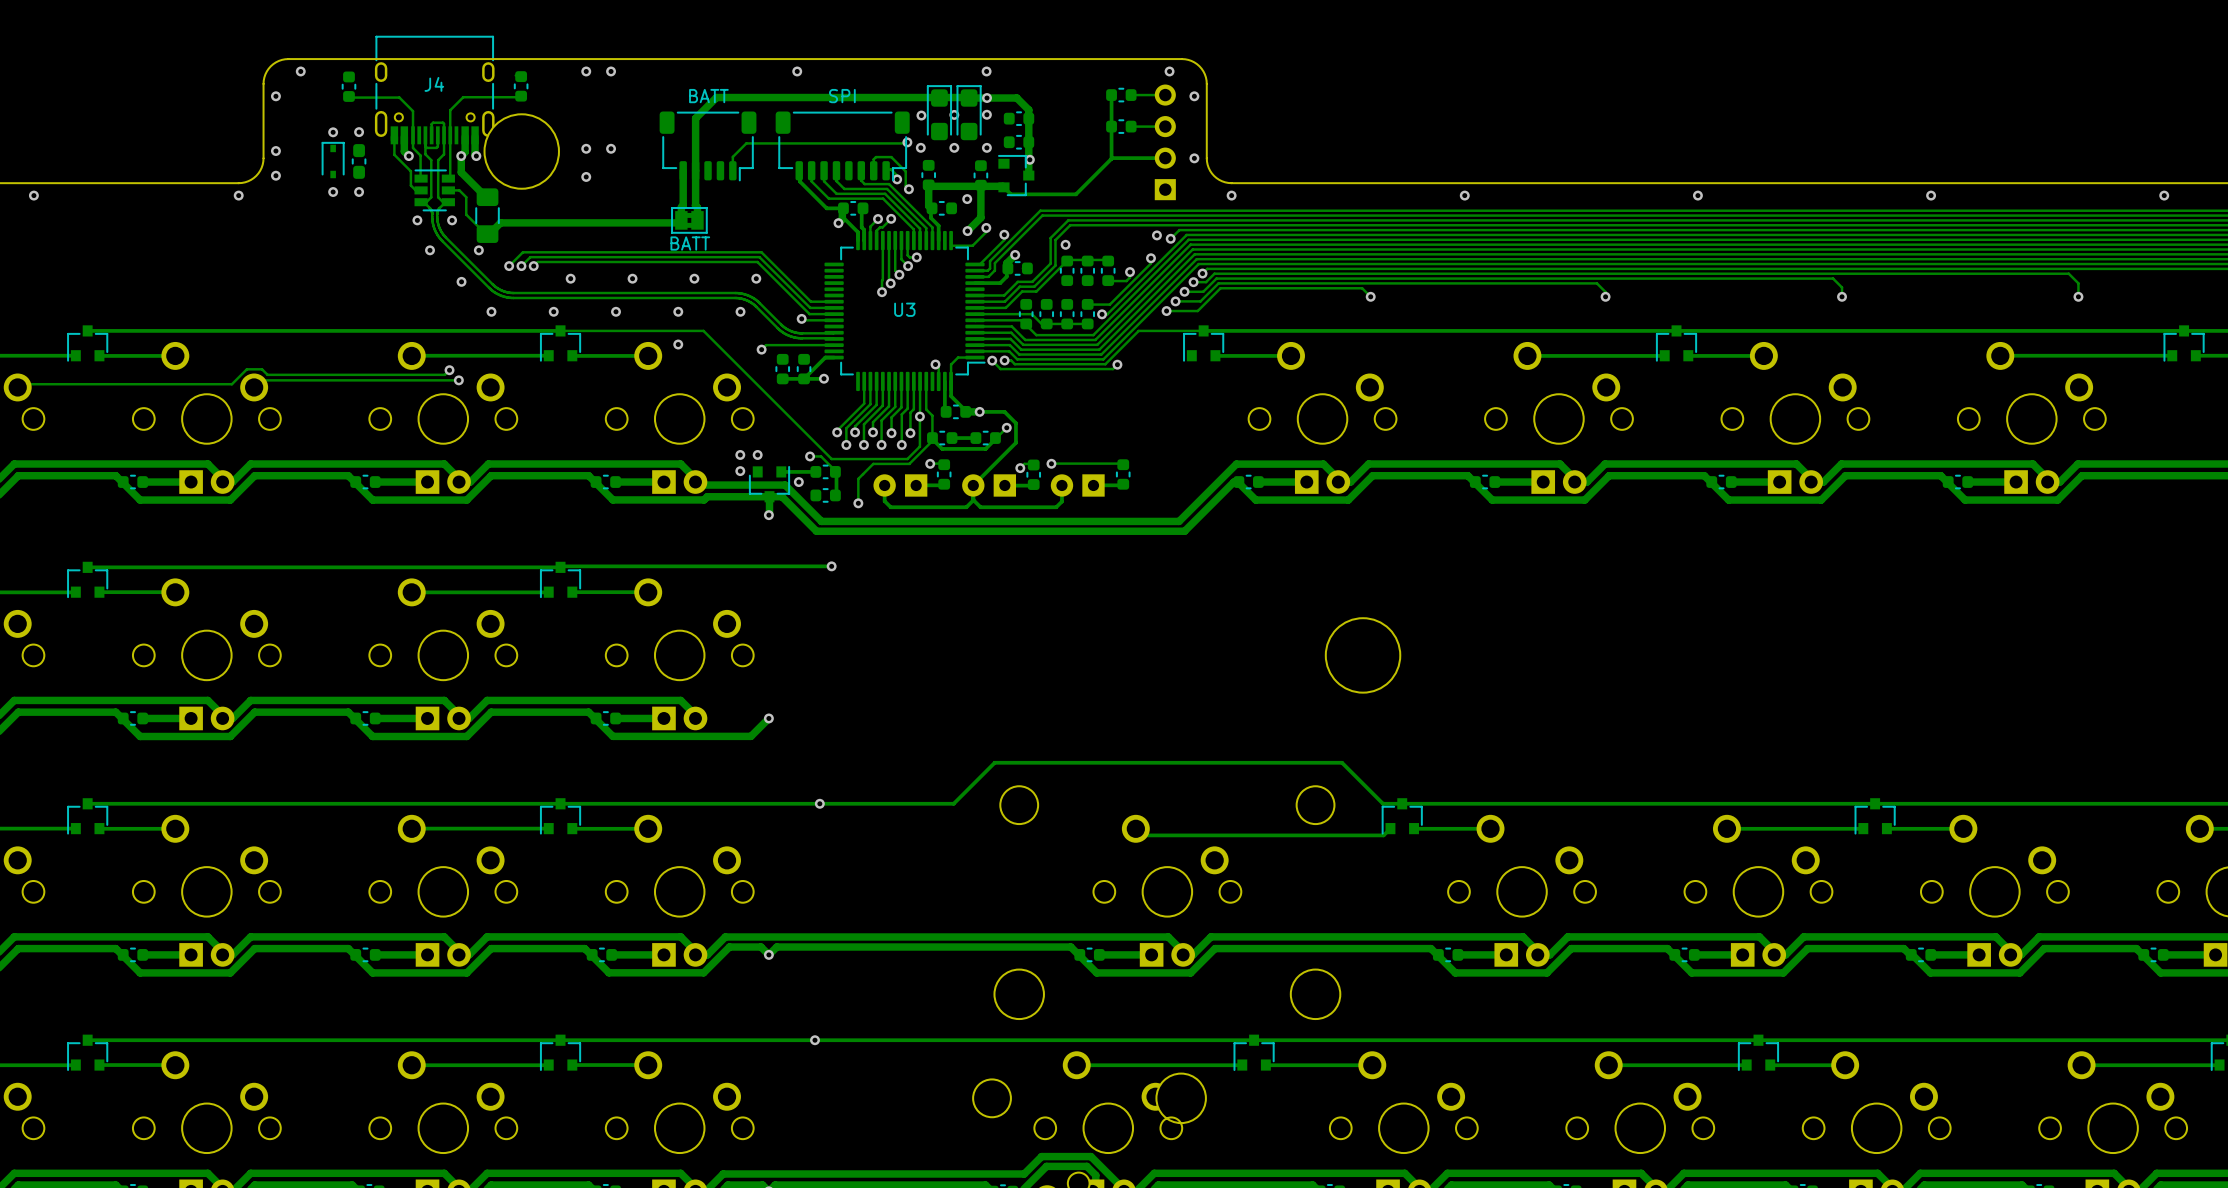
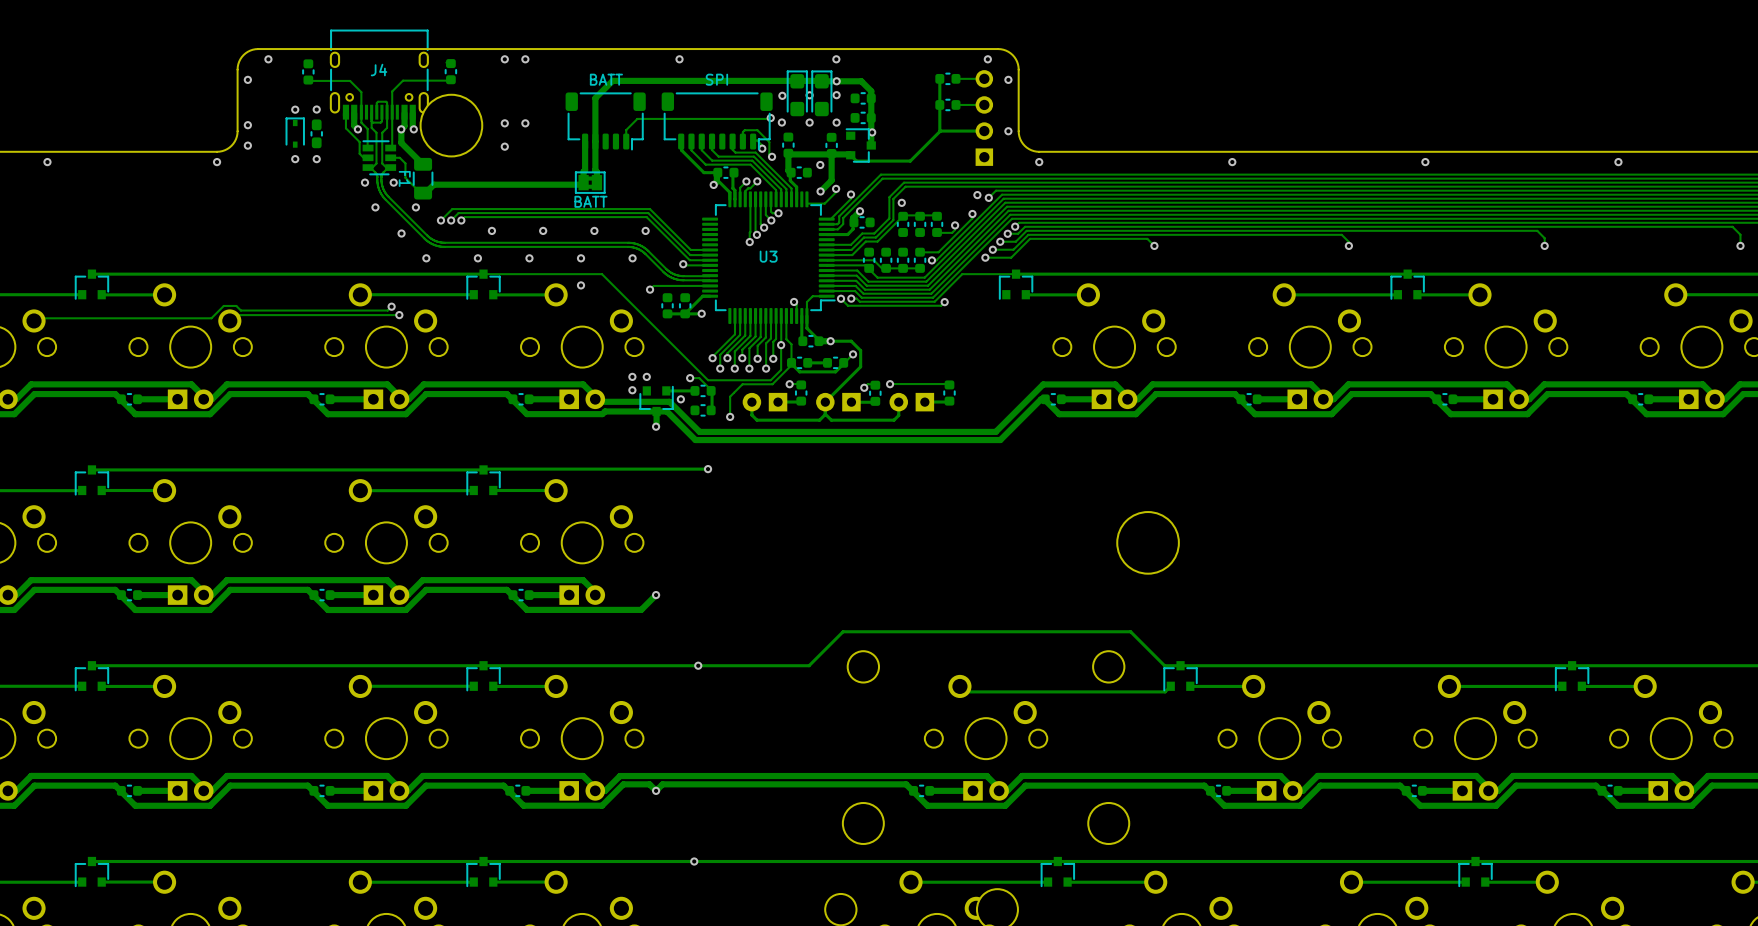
part: (487, 215) -> none
F1: none -> (423, 178)

